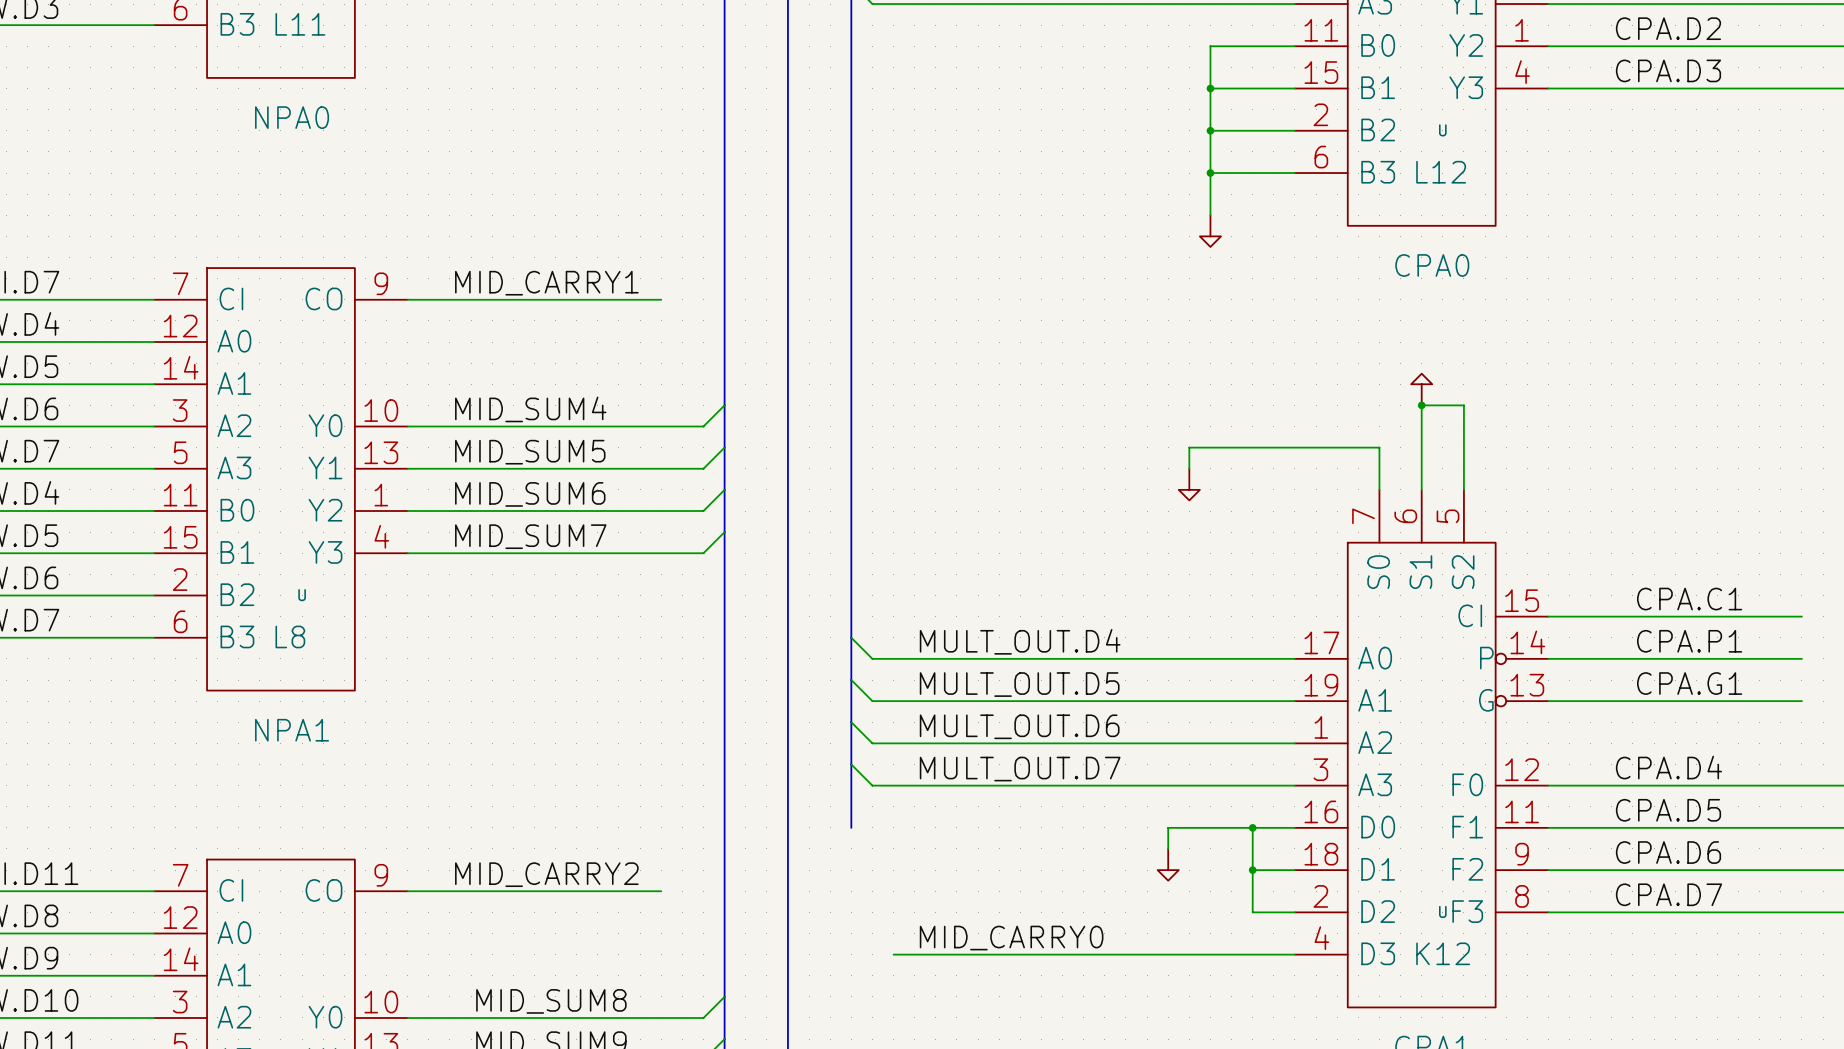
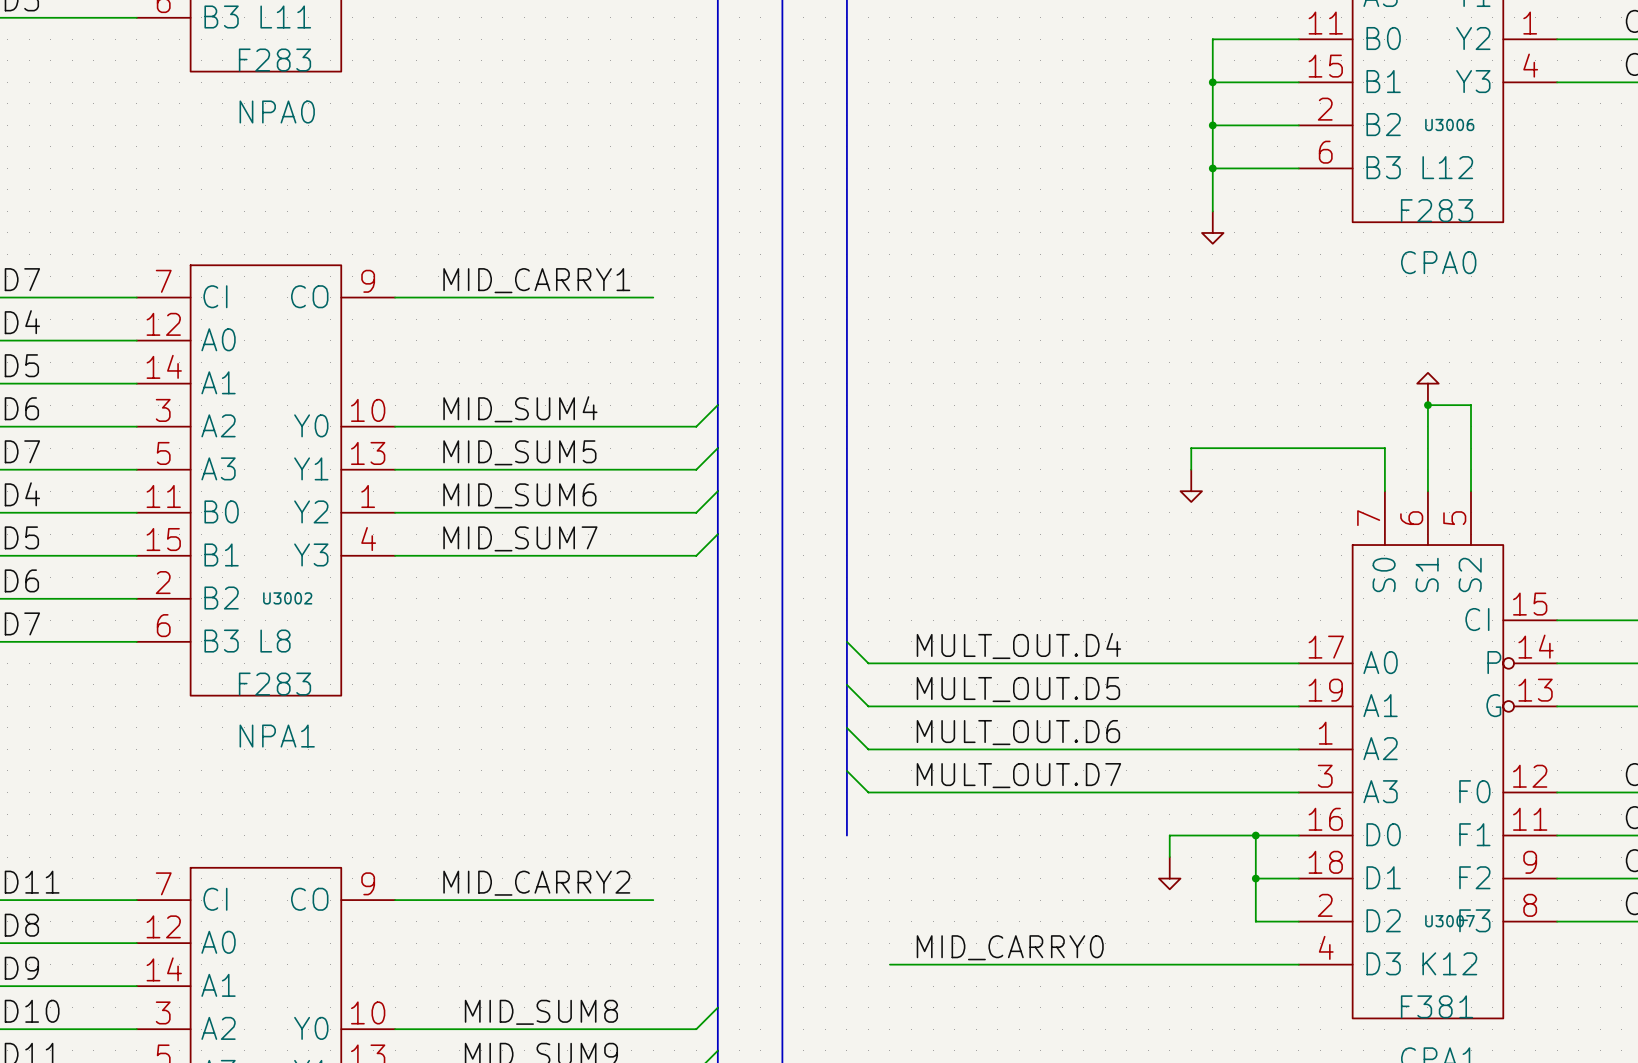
part value: none -> F283 (274, 60)
U name: U (1442, 130) -> U3006 (1449, 124)
U value: none -> F283 (1437, 210)
U name: U (302, 595) -> U3002 (287, 598)
U value: none -> F283 (274, 684)
U name: U (1442, 911) -> U3007 (1449, 921)
U value: none -> F381 (1437, 1006)

